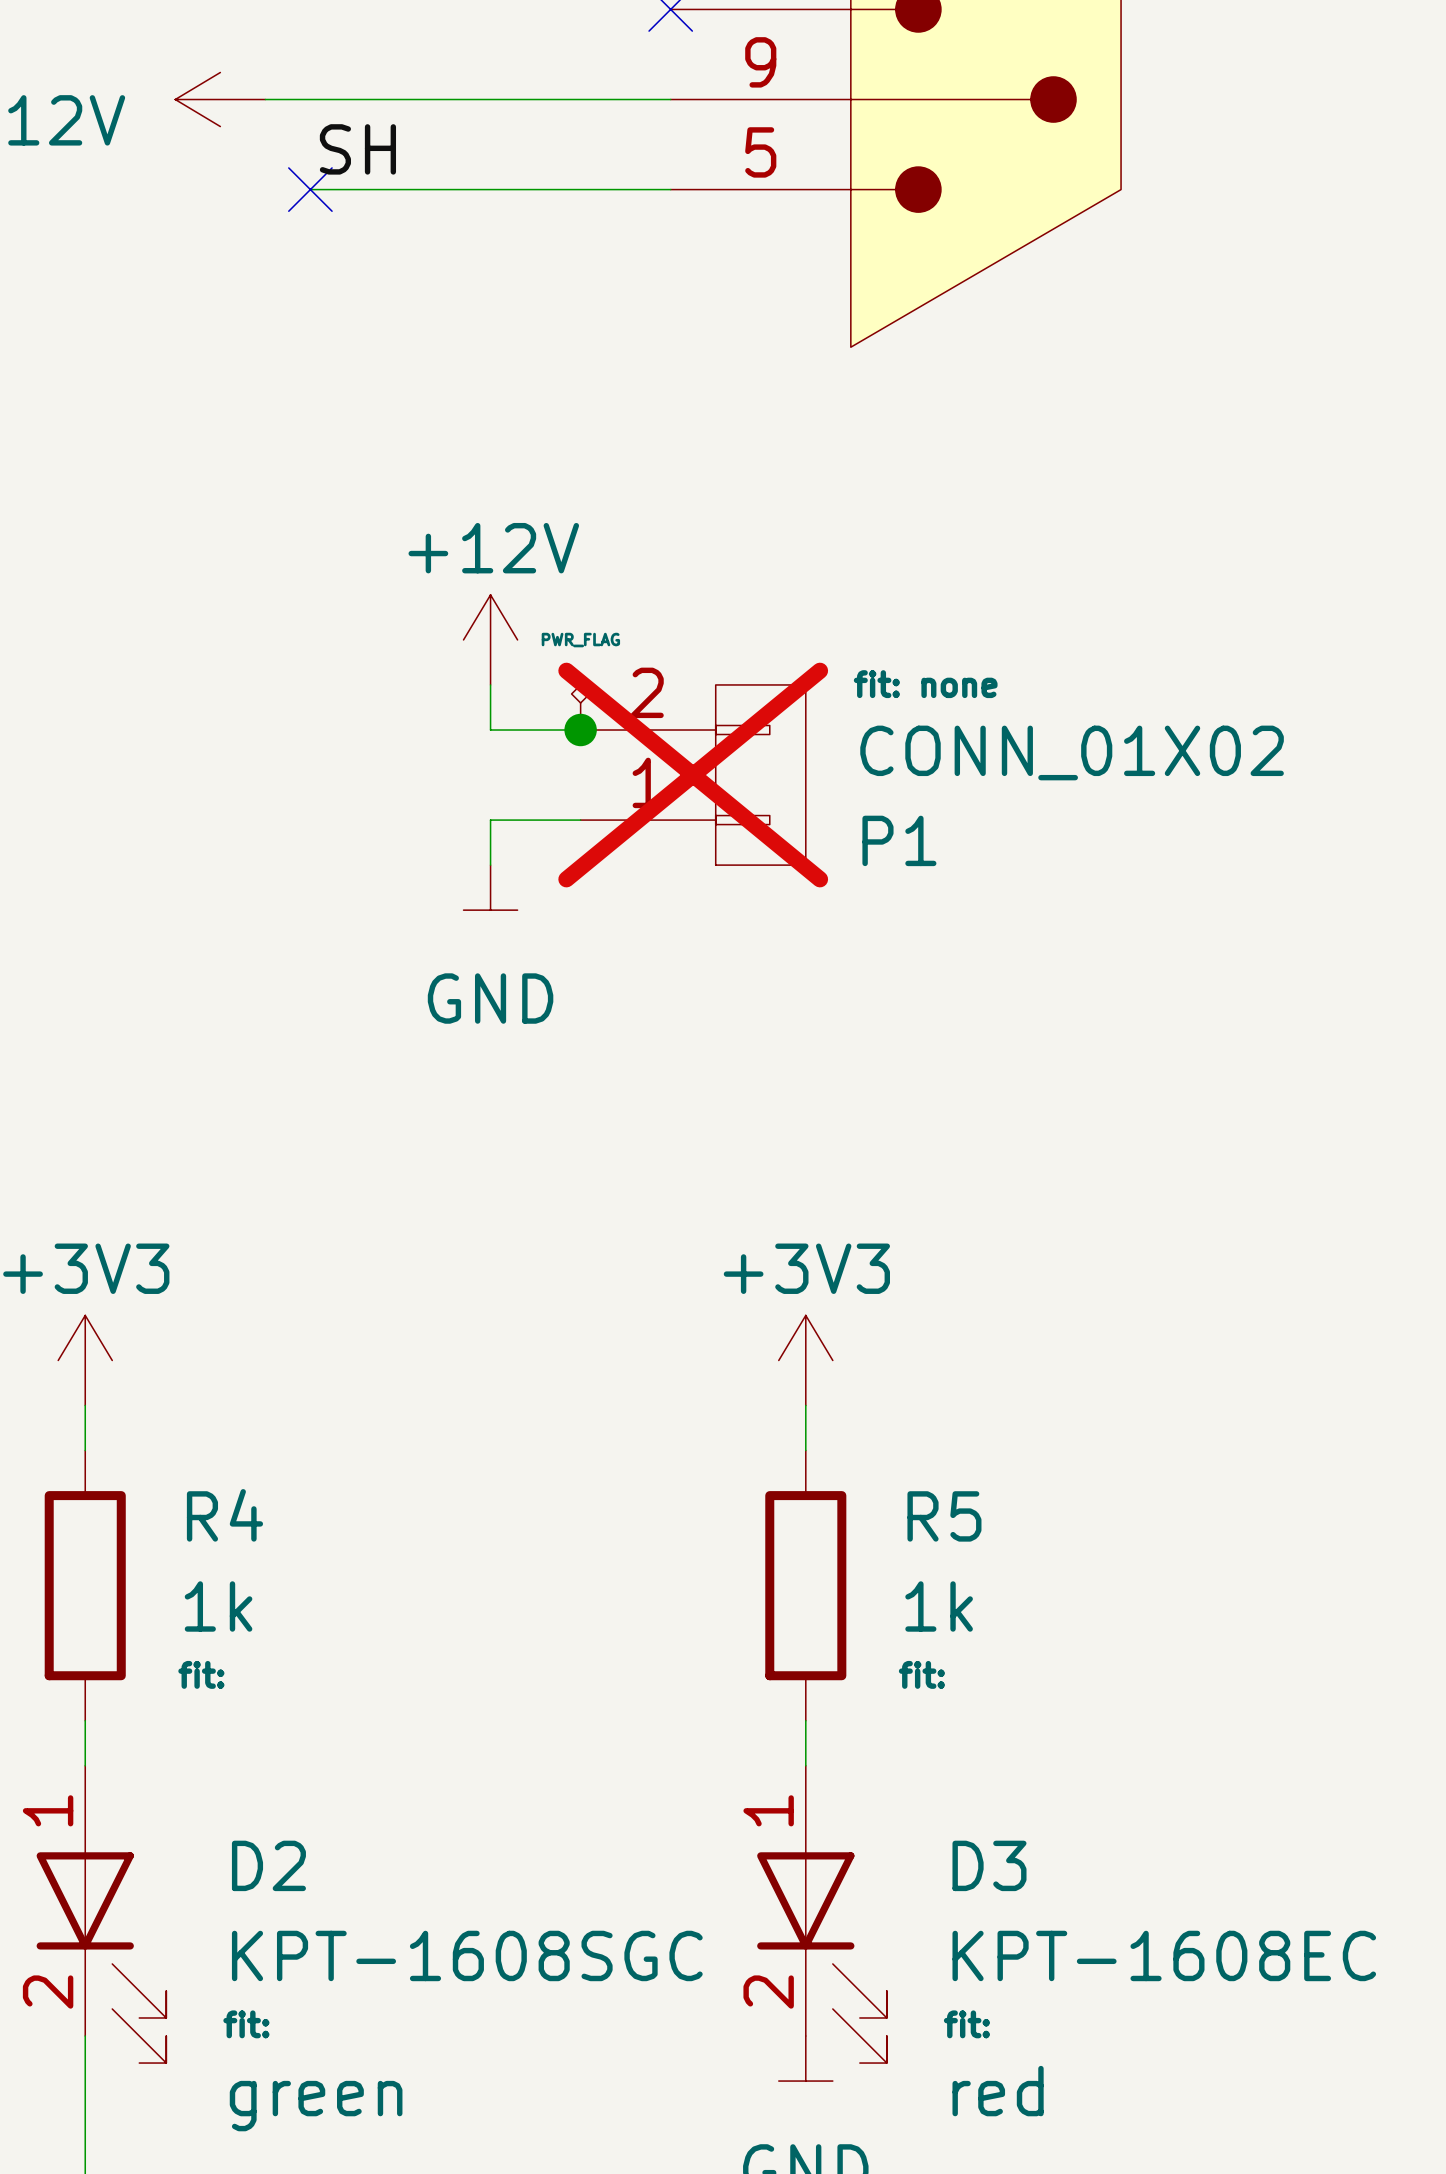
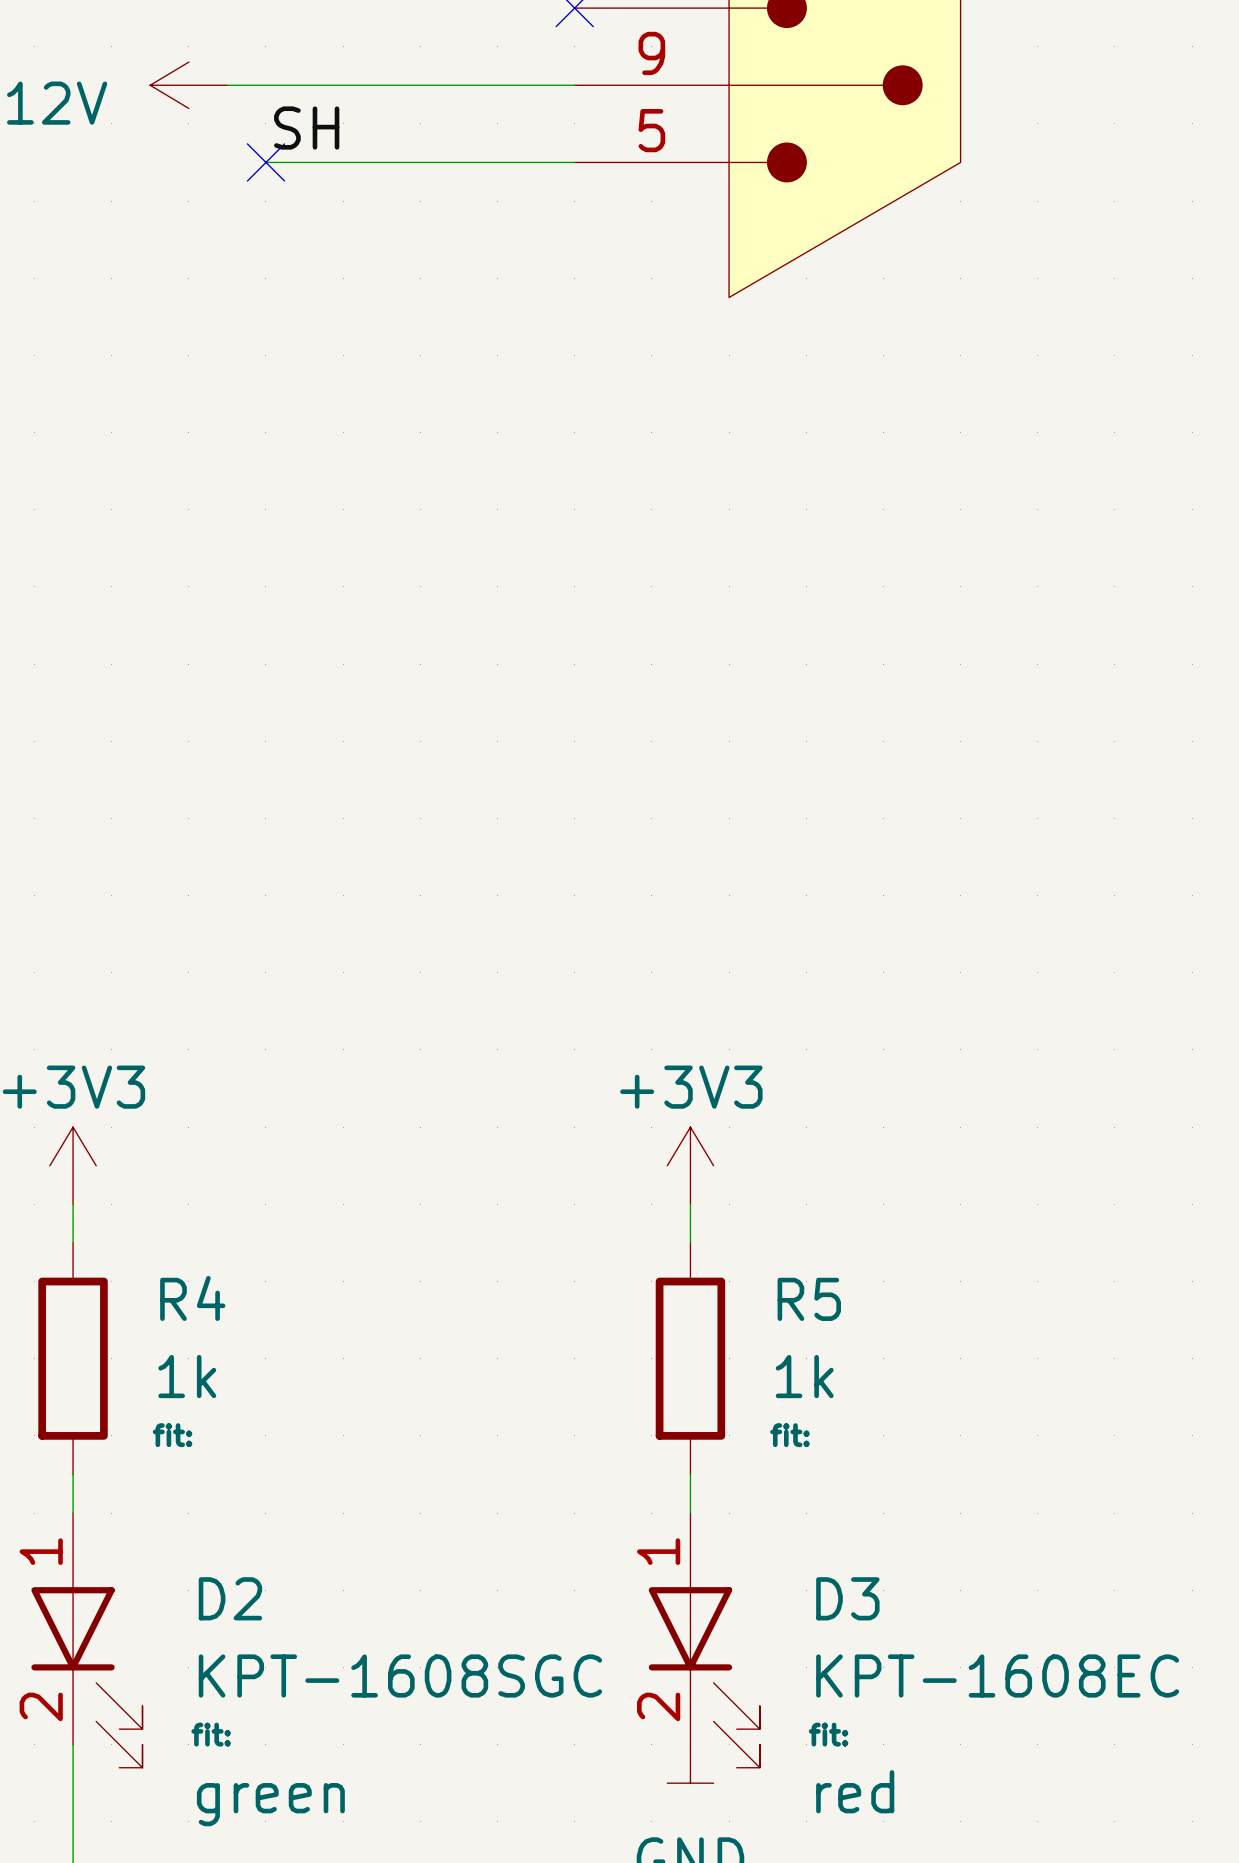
power symbol: +12V (490, 639) -> none
wire: (490, 684) (490, 730) (580, 730) -> none
power symbol: PWR_FLAG (580, 707) -> none
junction: (580, 730) -> none
P1: CONN_01X02 (693, 775) -> none
wire: (580, 820) (490, 820) (490, 865) -> none
power symbol: GND (490, 887) -> none

